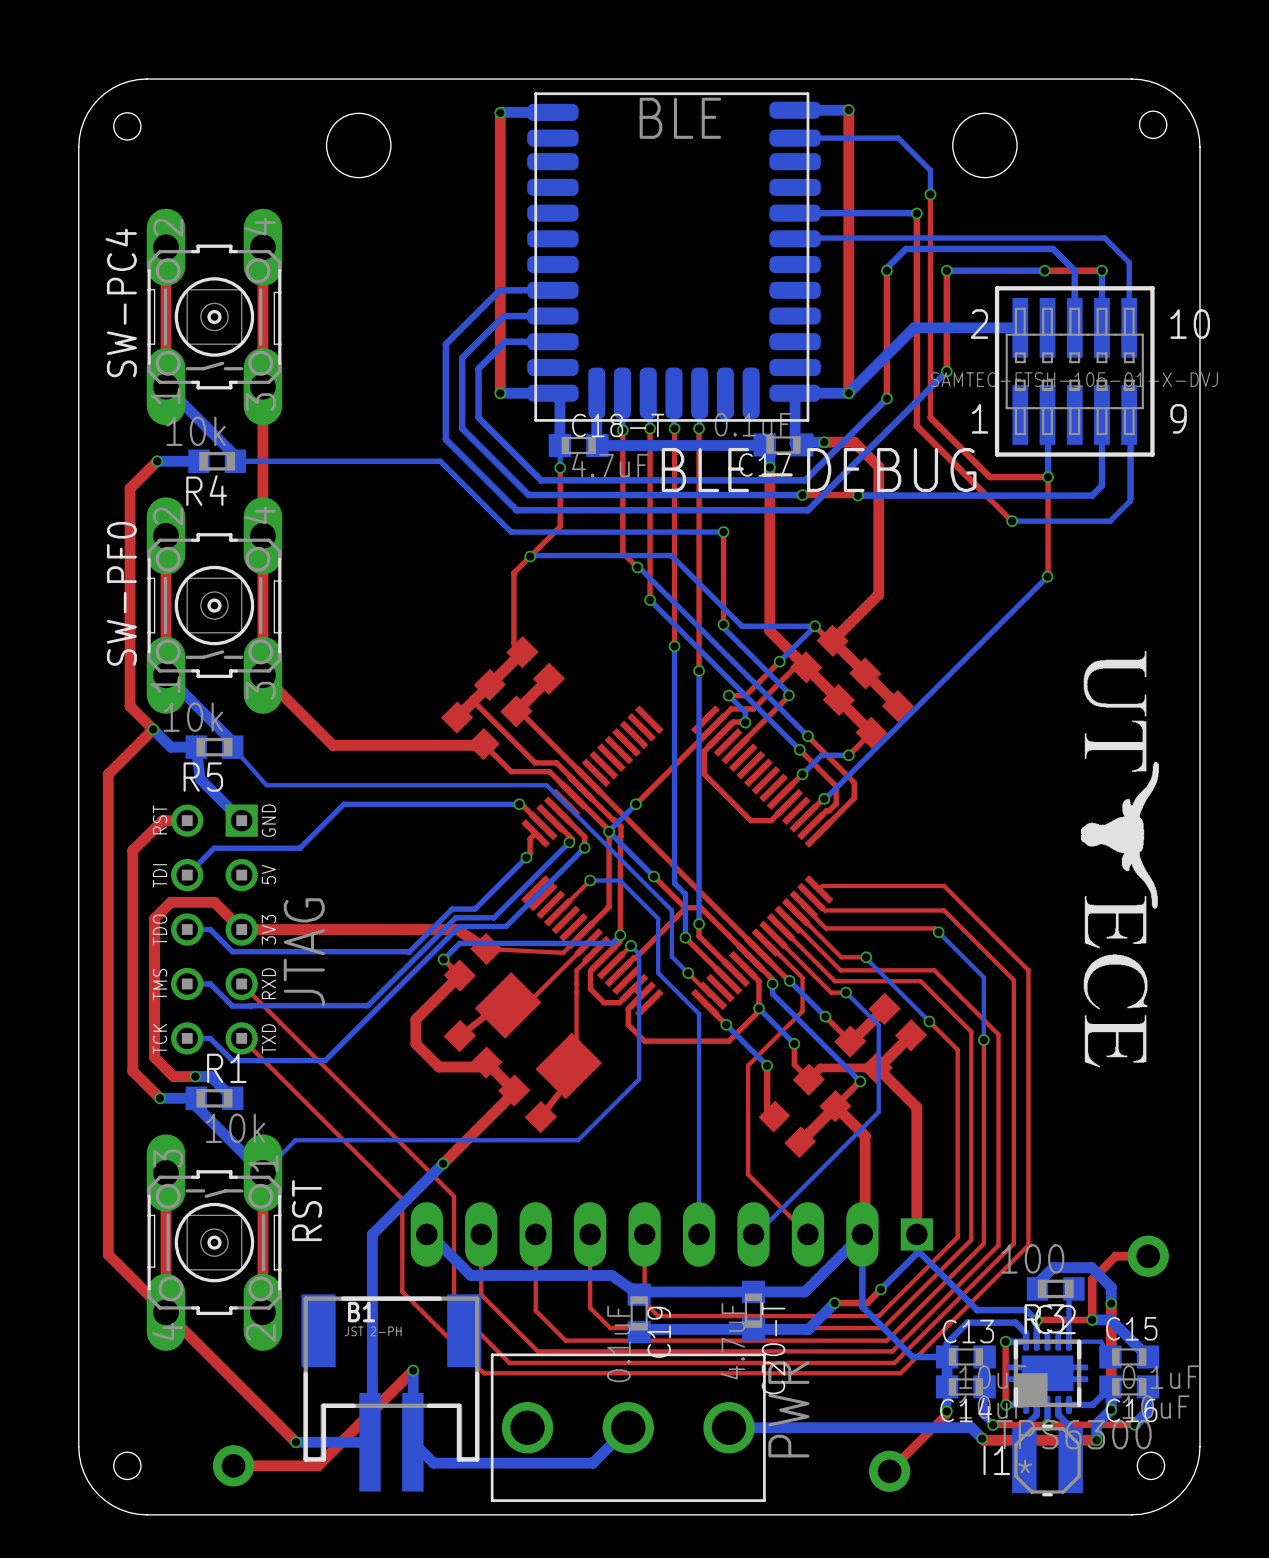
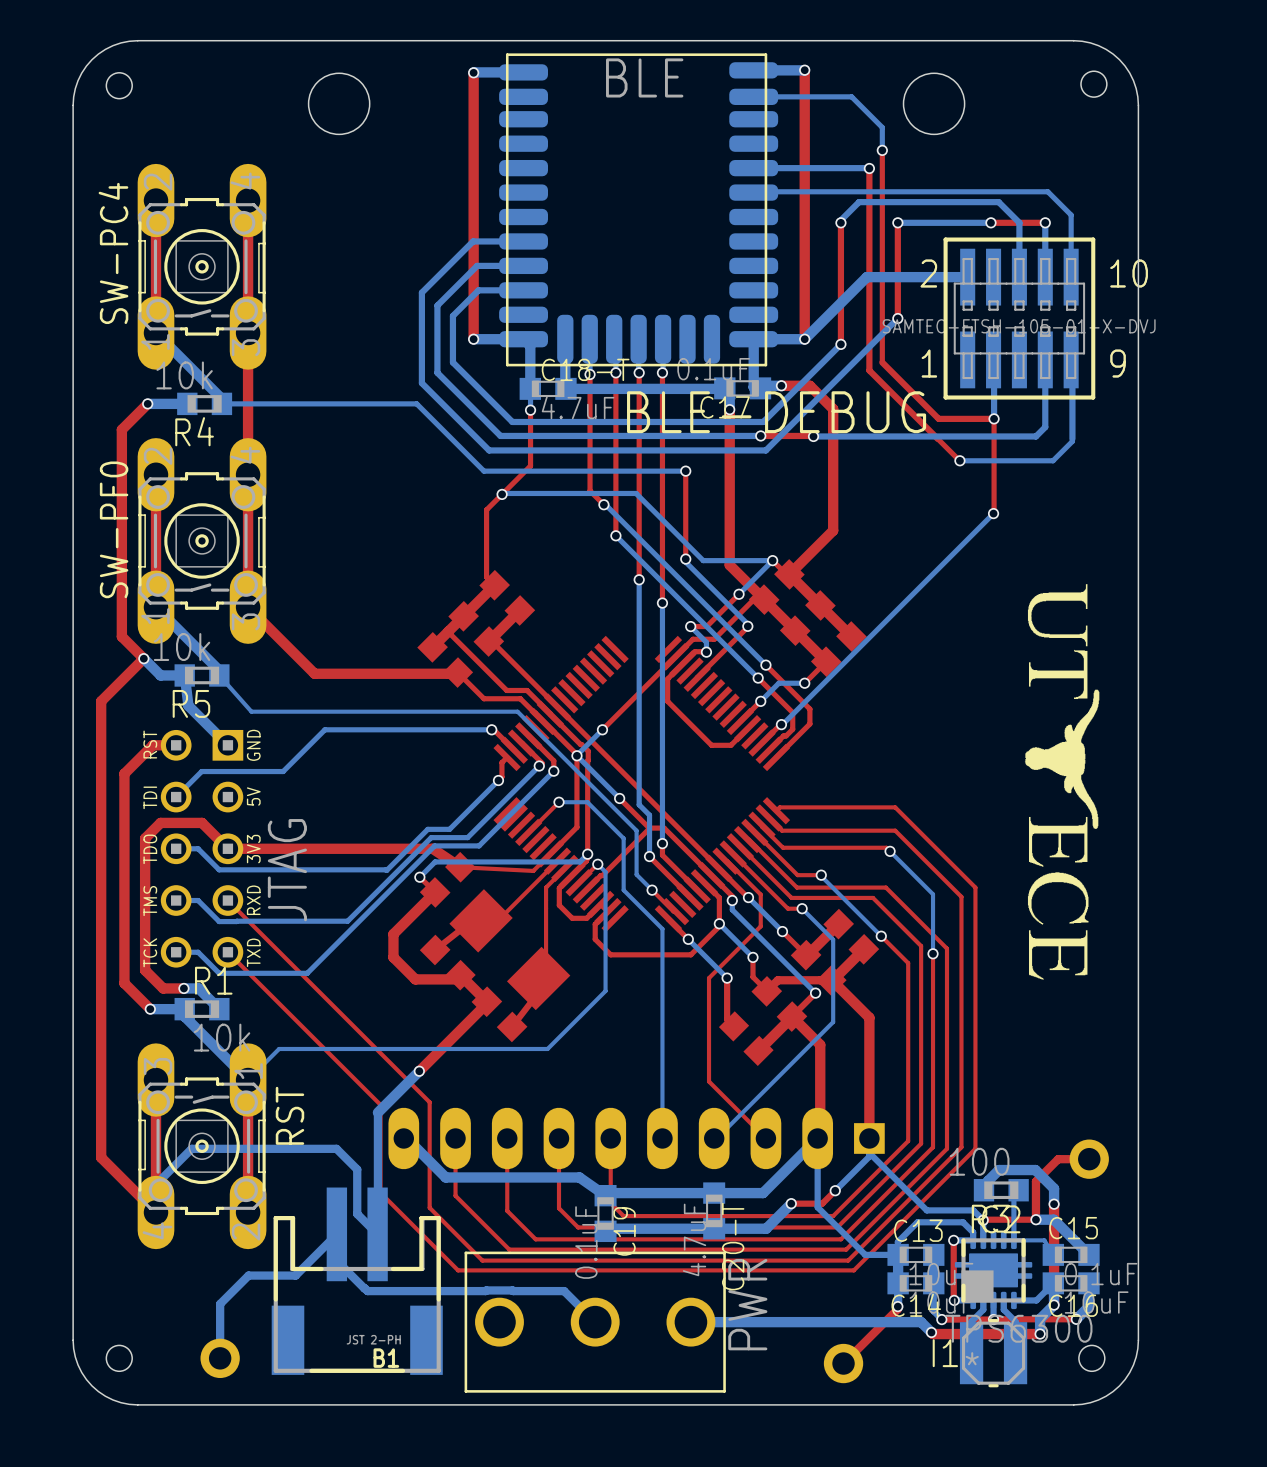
bottom track: (399, 1207) (372, 1234) (372, 1439) (369, 1442) (295, 1442) -> (377, 1112) (377, 1244)
bottom track: none -> (156, 1212) (156, 1184) (191, 1148) (336, 1148) (357, 1169) (357, 1213) (377, 1234)
top track: (166, 1312) (295, 1442) -> none
bottom track: (413, 1370) (412, 1442) (433, 1463) (592, 1463) (628, 1427) -> (220, 1358) (220, 1304) (248, 1275) (295, 1275) (336, 1234) (336, 1260) (367, 1291) (564, 1291) (595, 1322)
top track: (413, 1370) (317, 1465) (233, 1465) -> none
via: (413, 1370) -> none
B1 rotation: 0° (391, 1392) -> 180° (357, 1281)
via: (295, 1442) -> none

